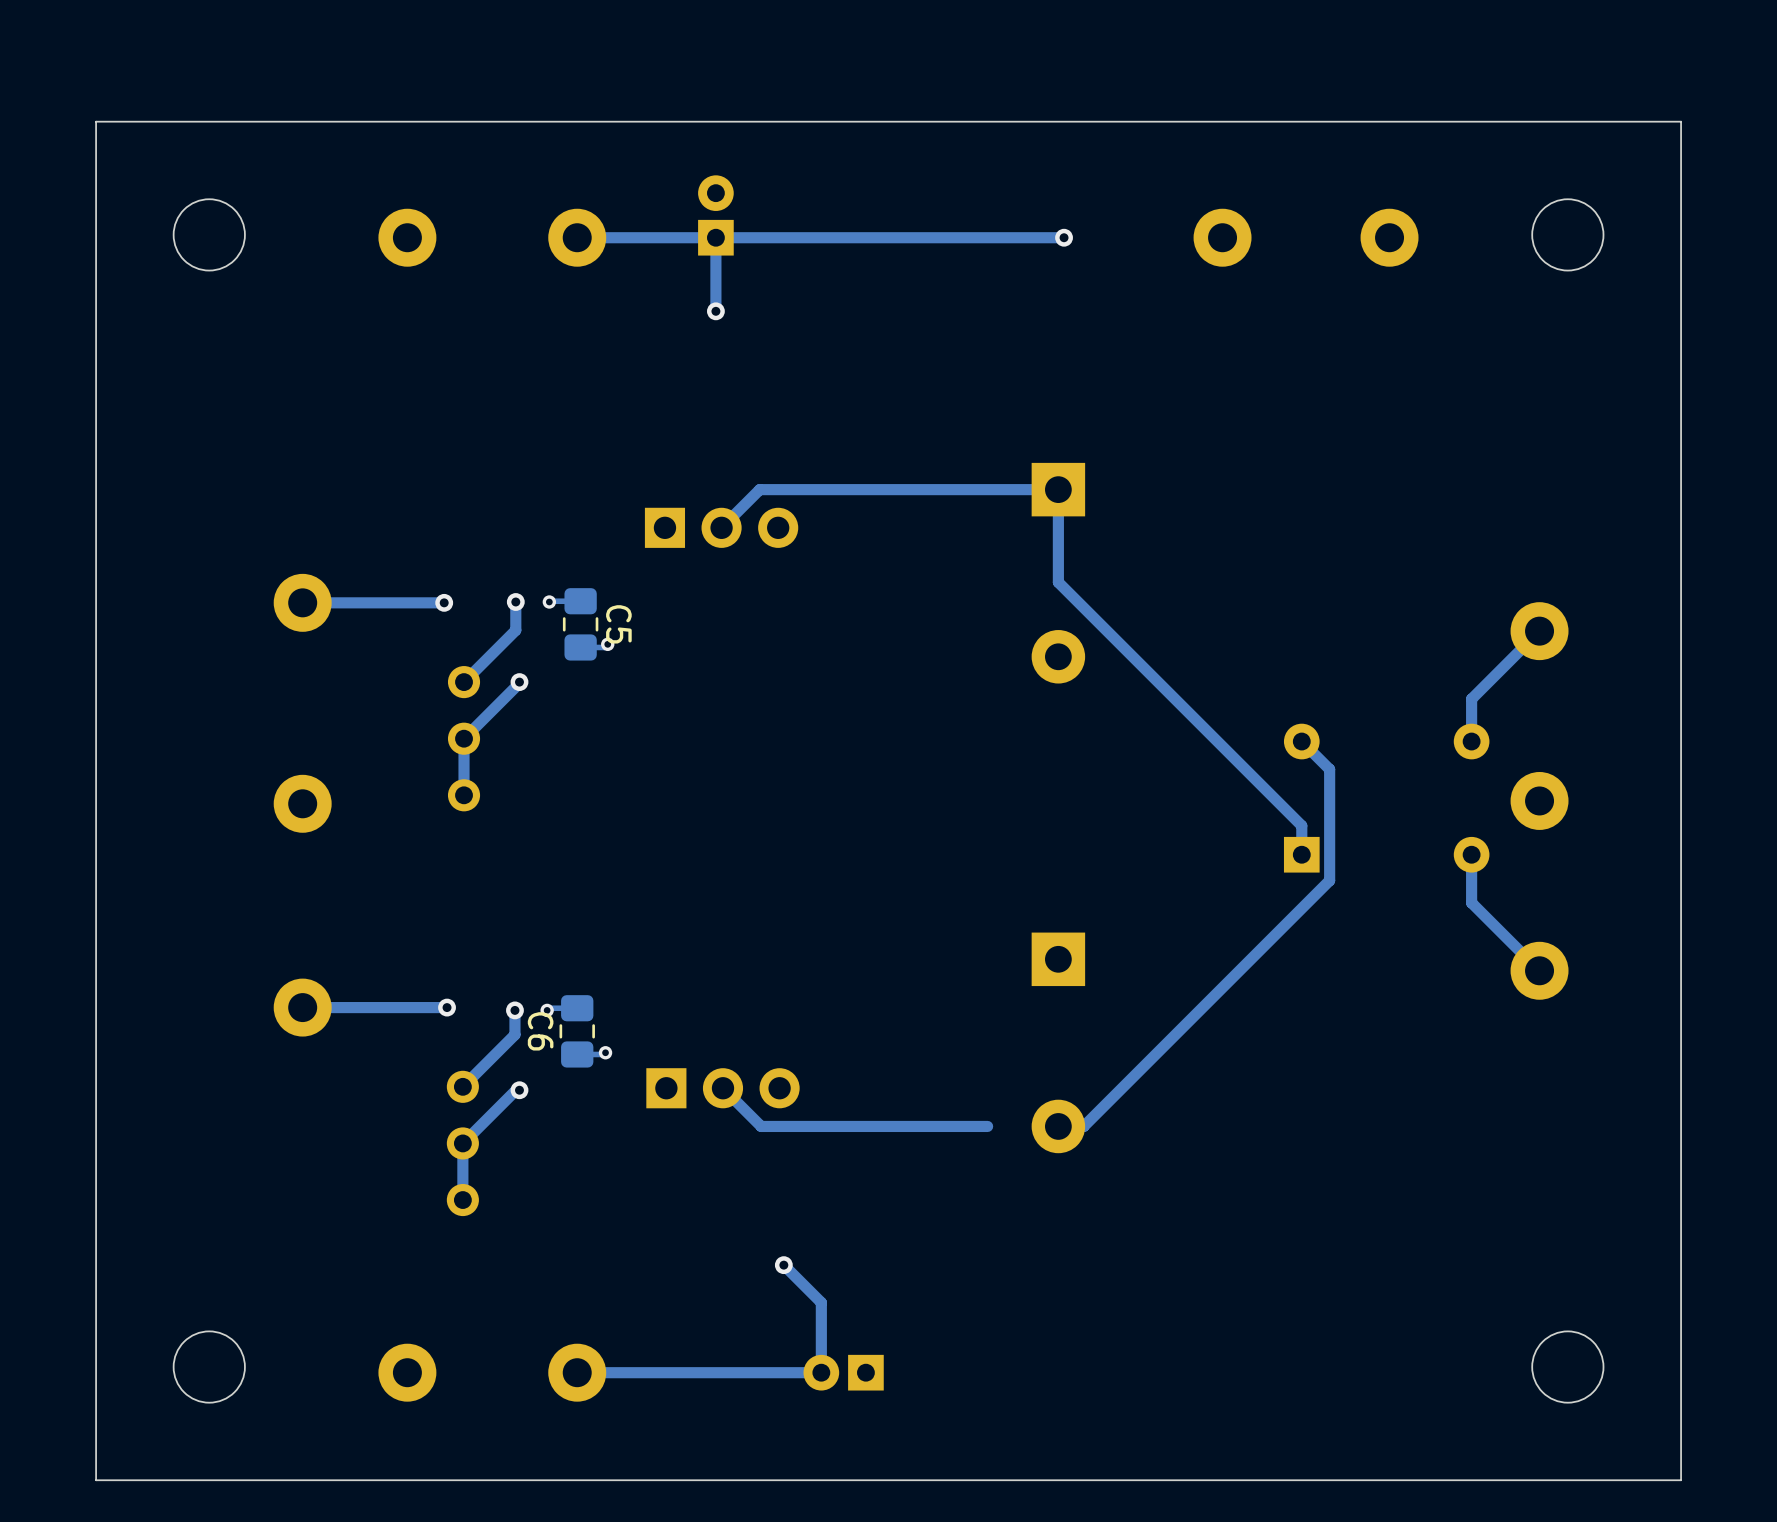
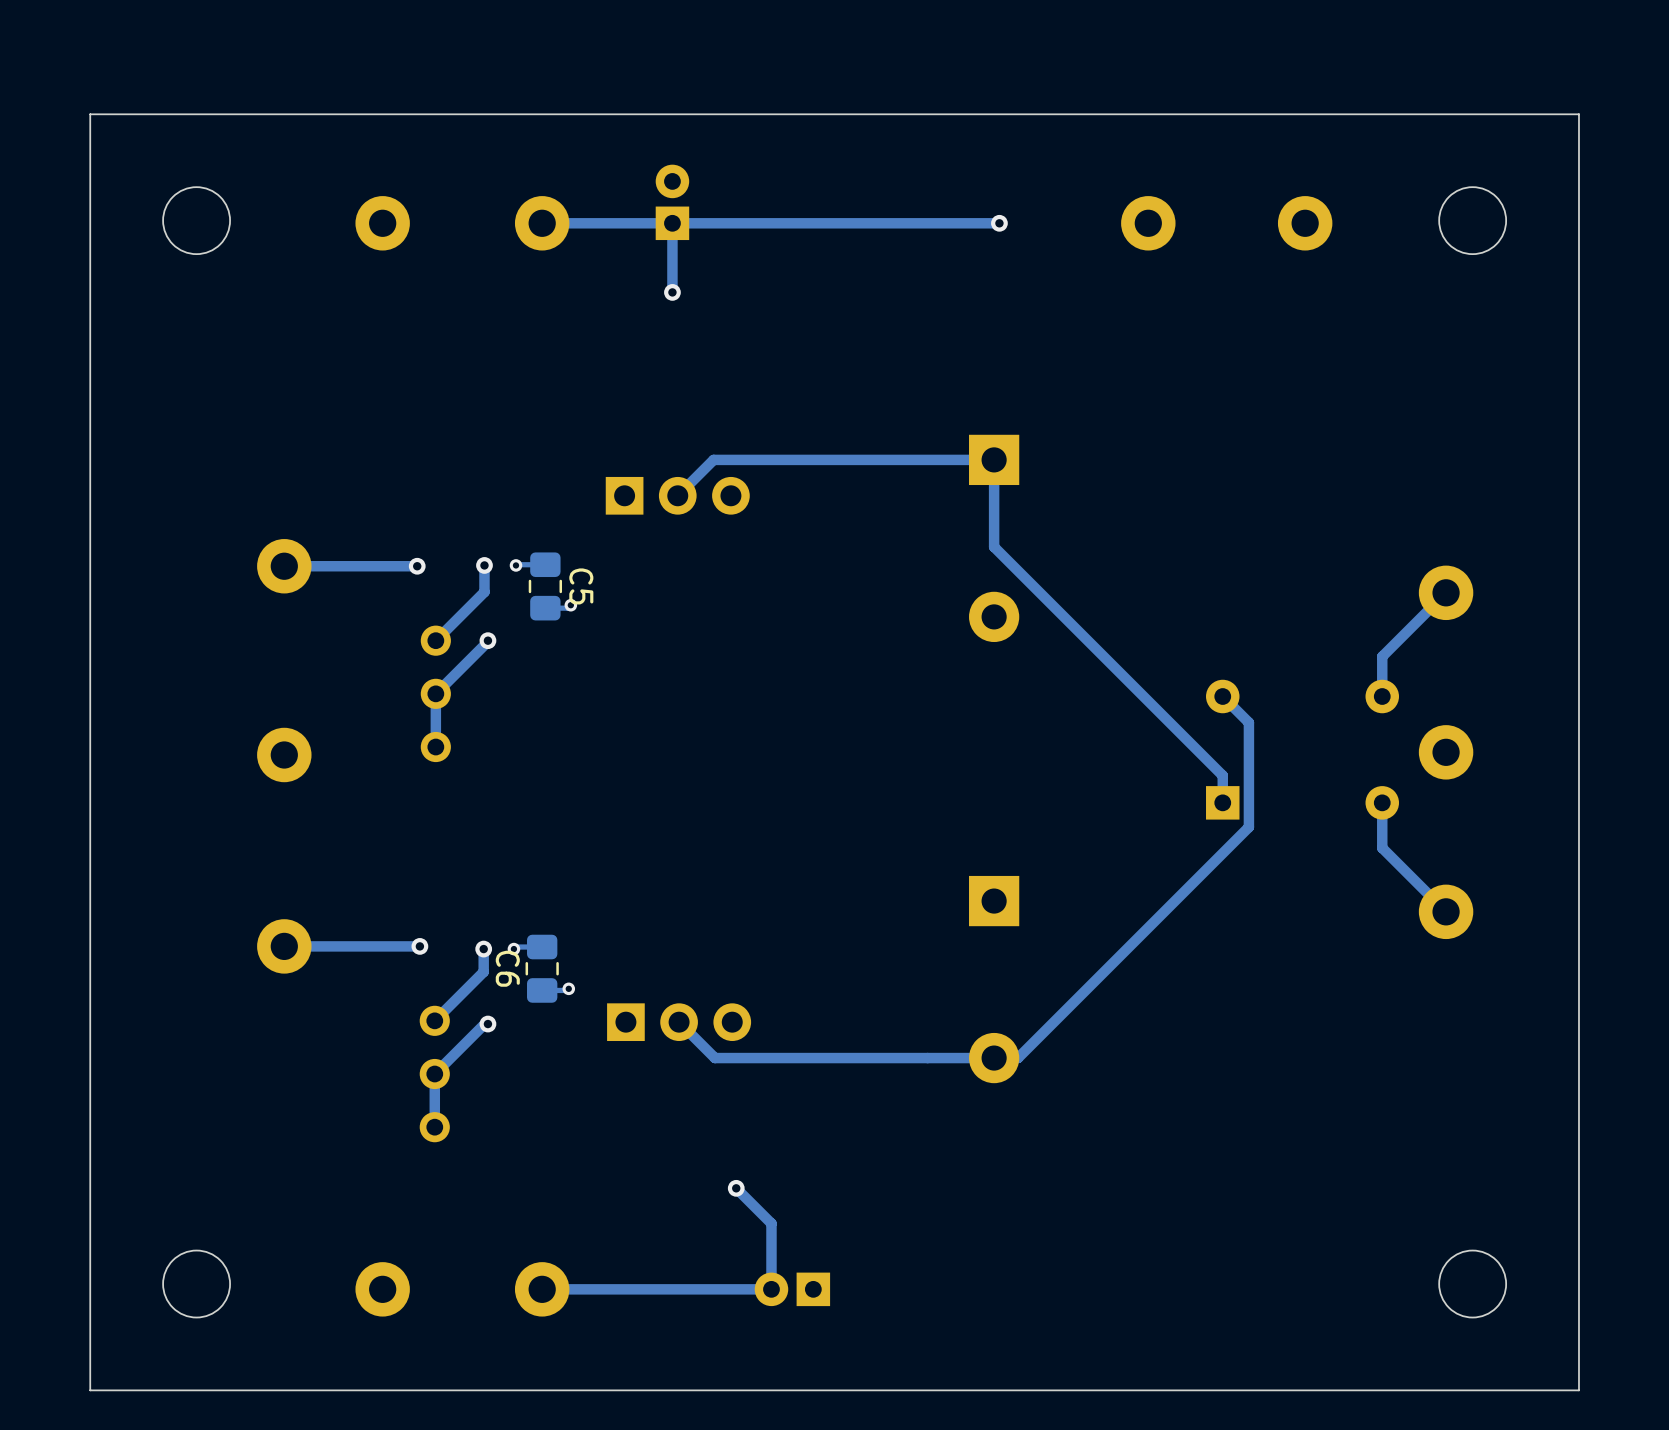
track: none -> (994, 1058) (927, 1058)

